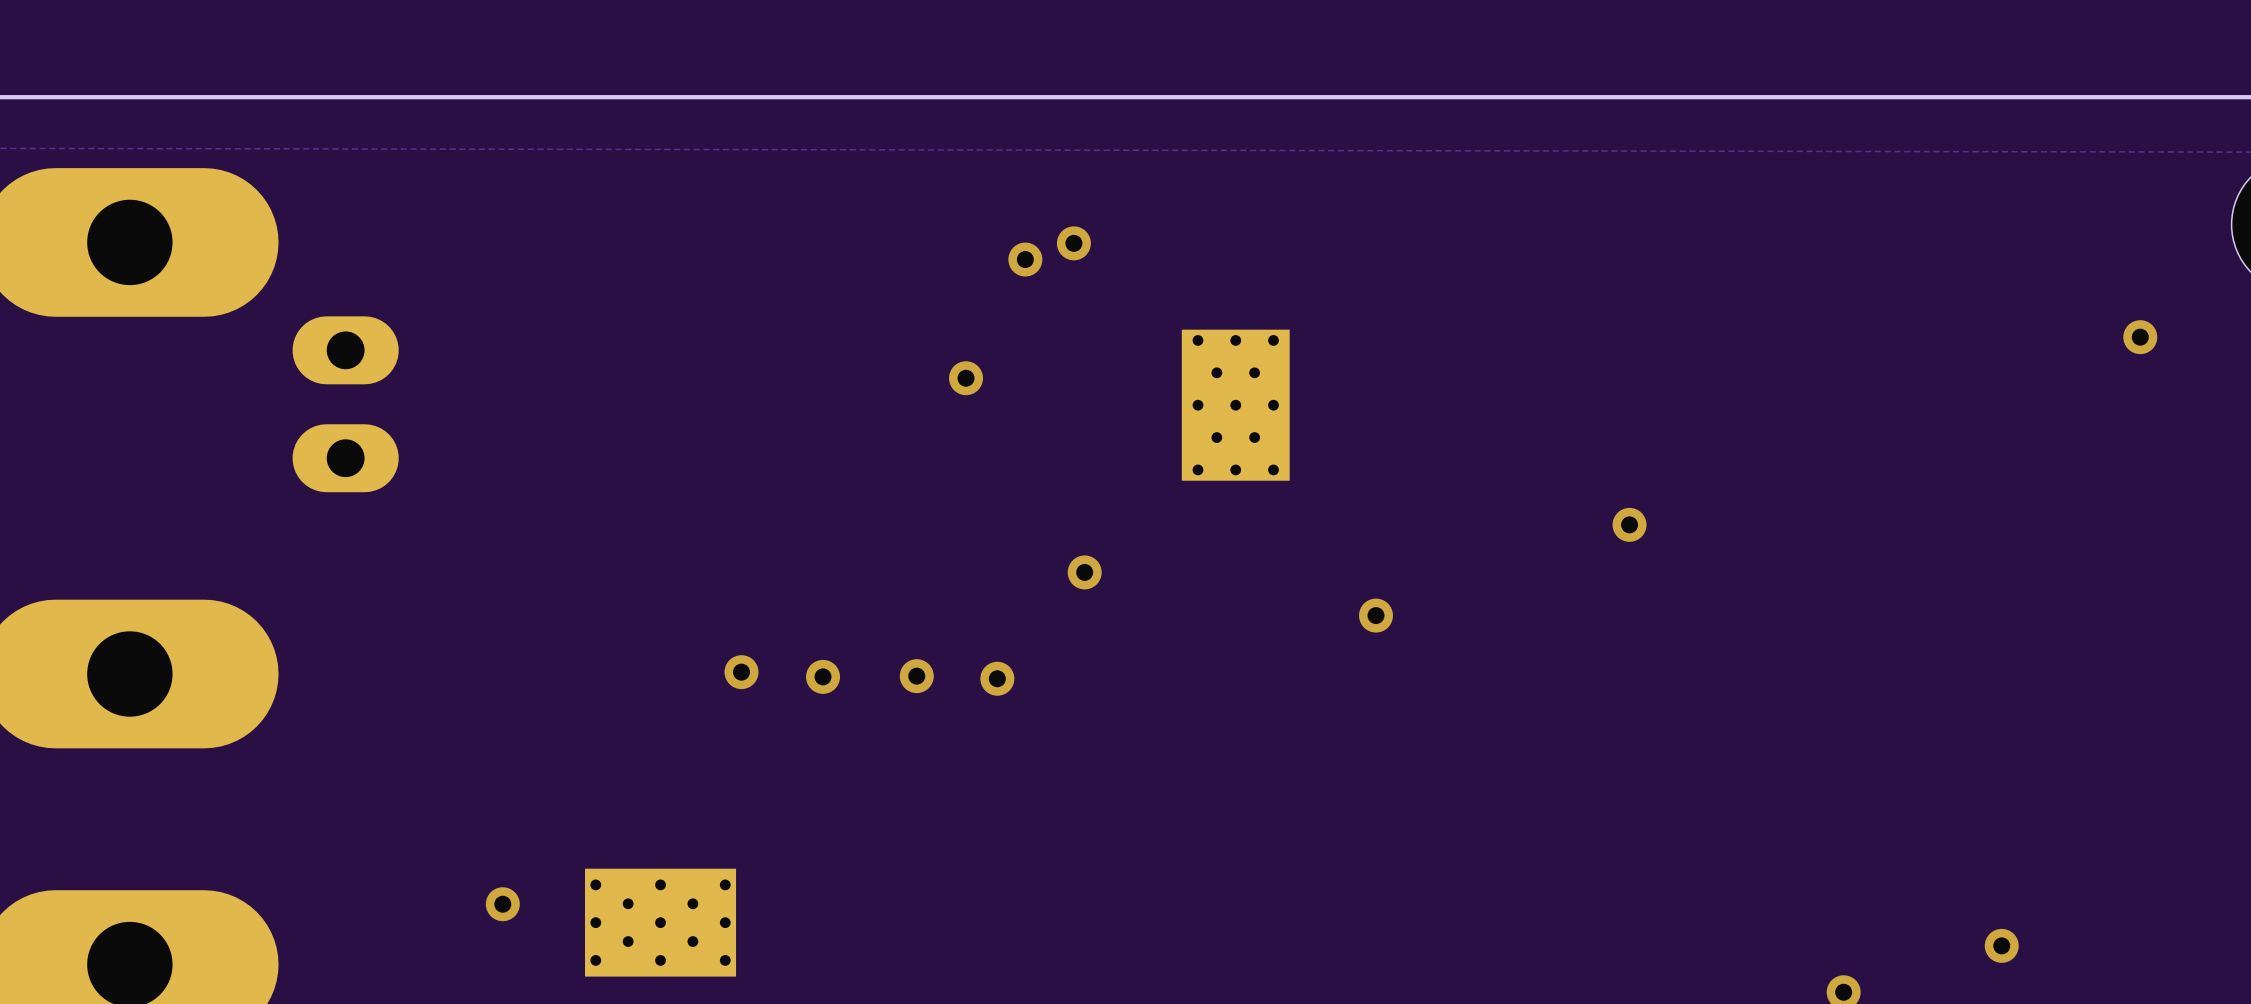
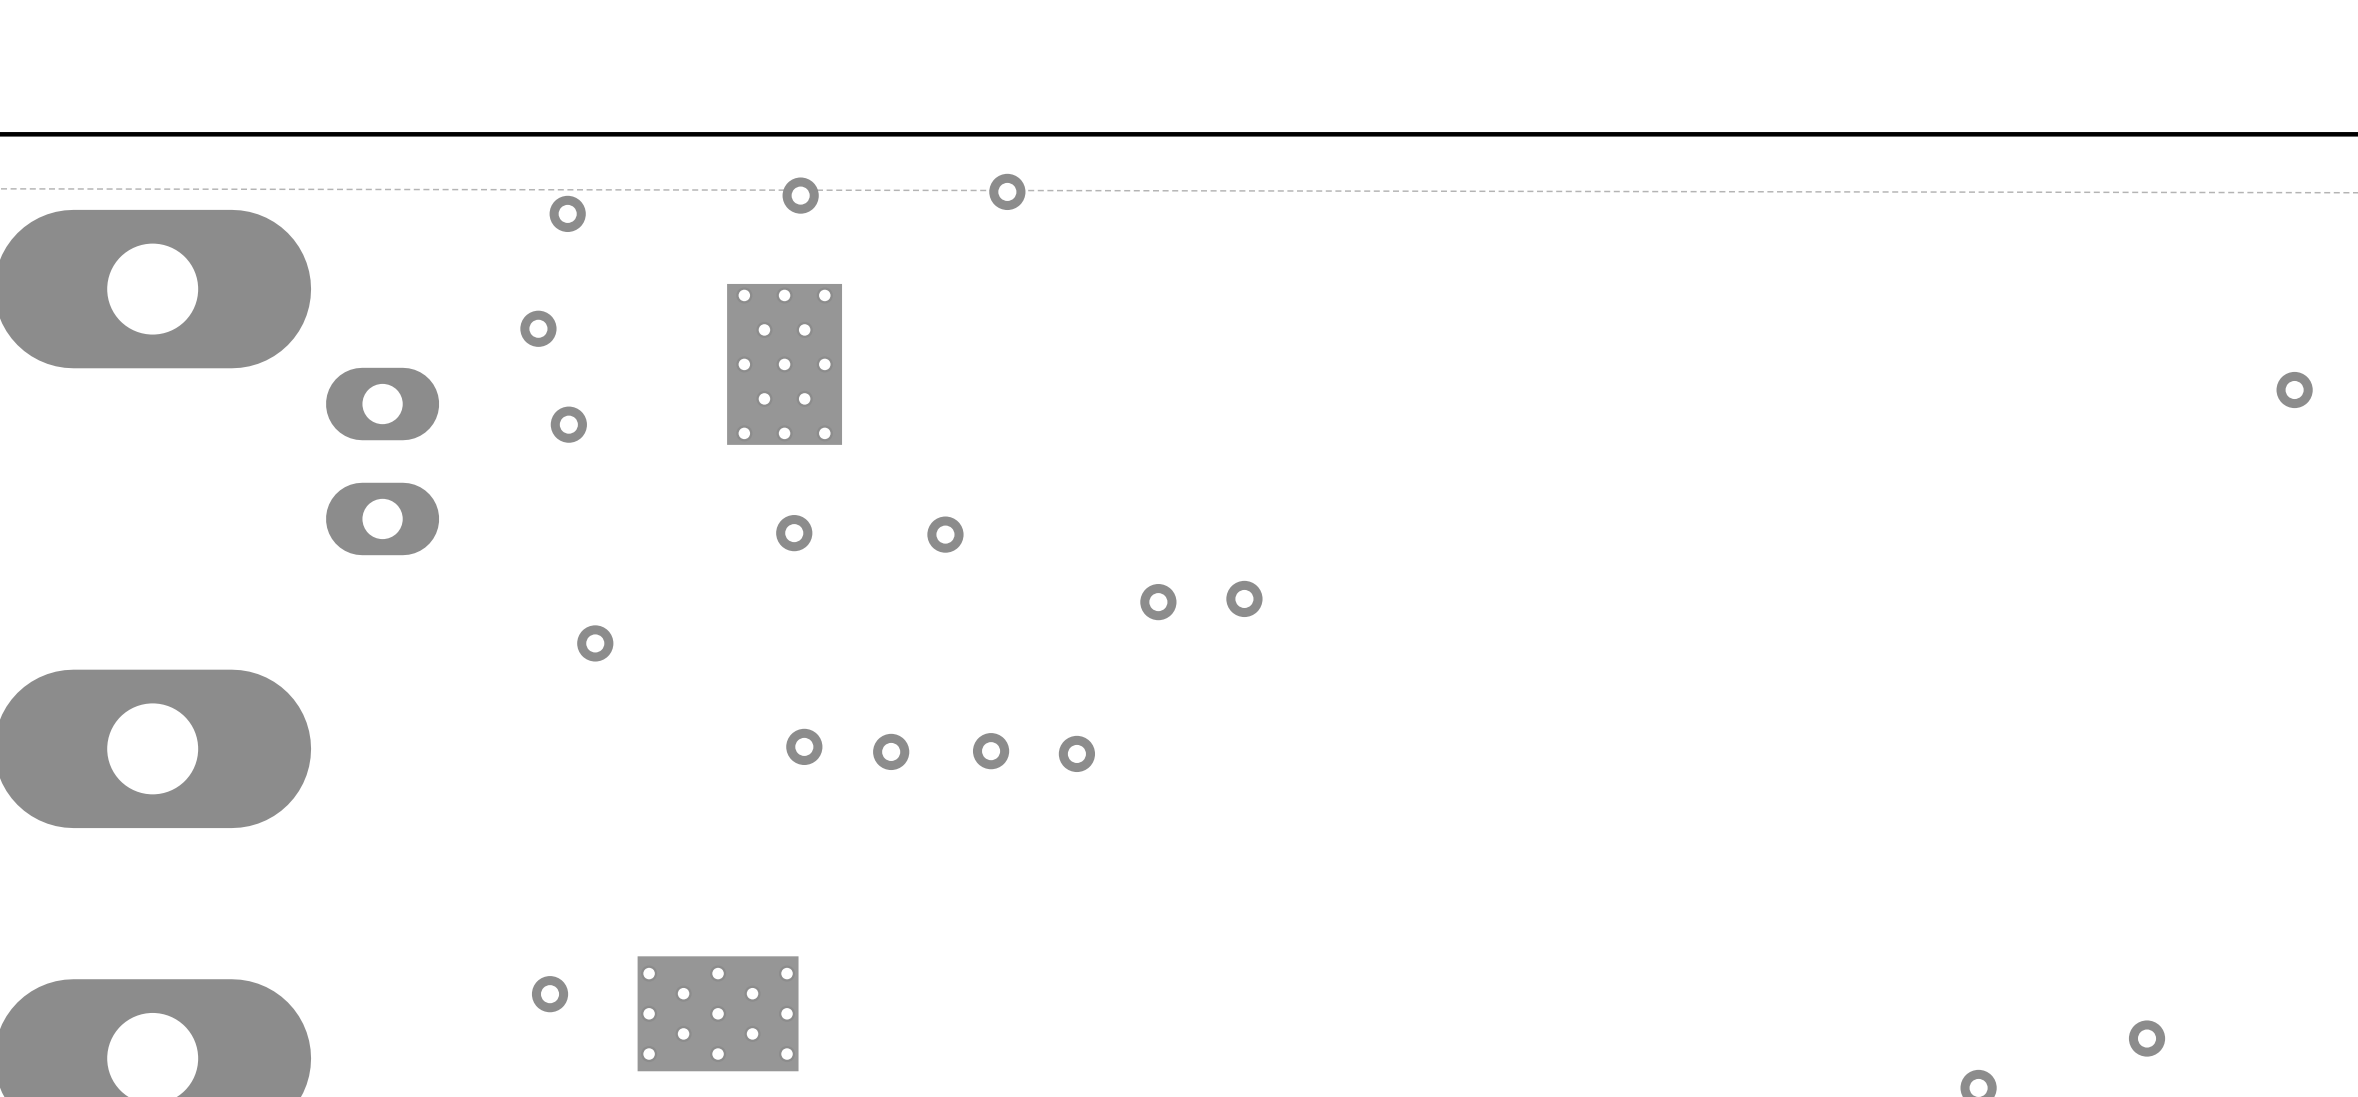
via: none -> (1007, 191)
via: none -> (800, 195)
via: none -> (567, 213)
via: (1073, 243) -> none
via: (1025, 259) -> none
via: none -> (538, 328)
via: none -> (568, 424)
via: (966, 378) -> none
part position: (1235, 405) -> (784, 364)
via: none -> (794, 533)
via: none -> (945, 534)
via: (1629, 524) -> none
via: none -> (1244, 598)
via position: (1084, 572) -> (1158, 602)
via: none -> (595, 643)
via: (1376, 615) -> none

